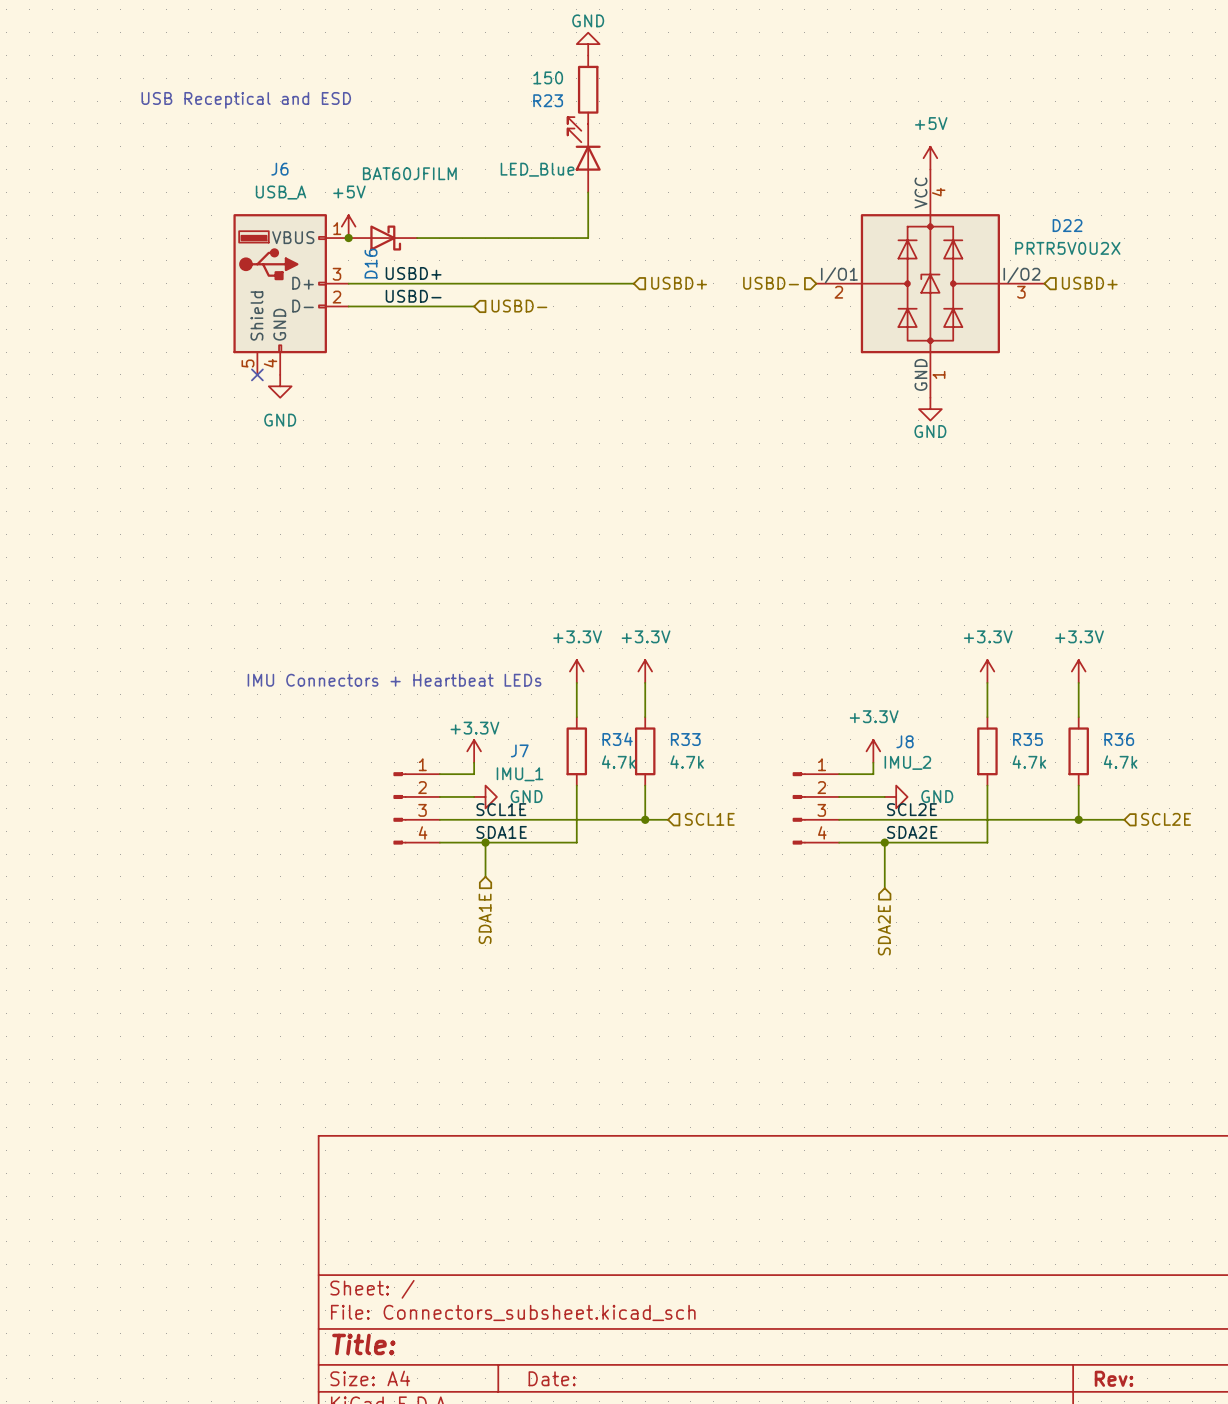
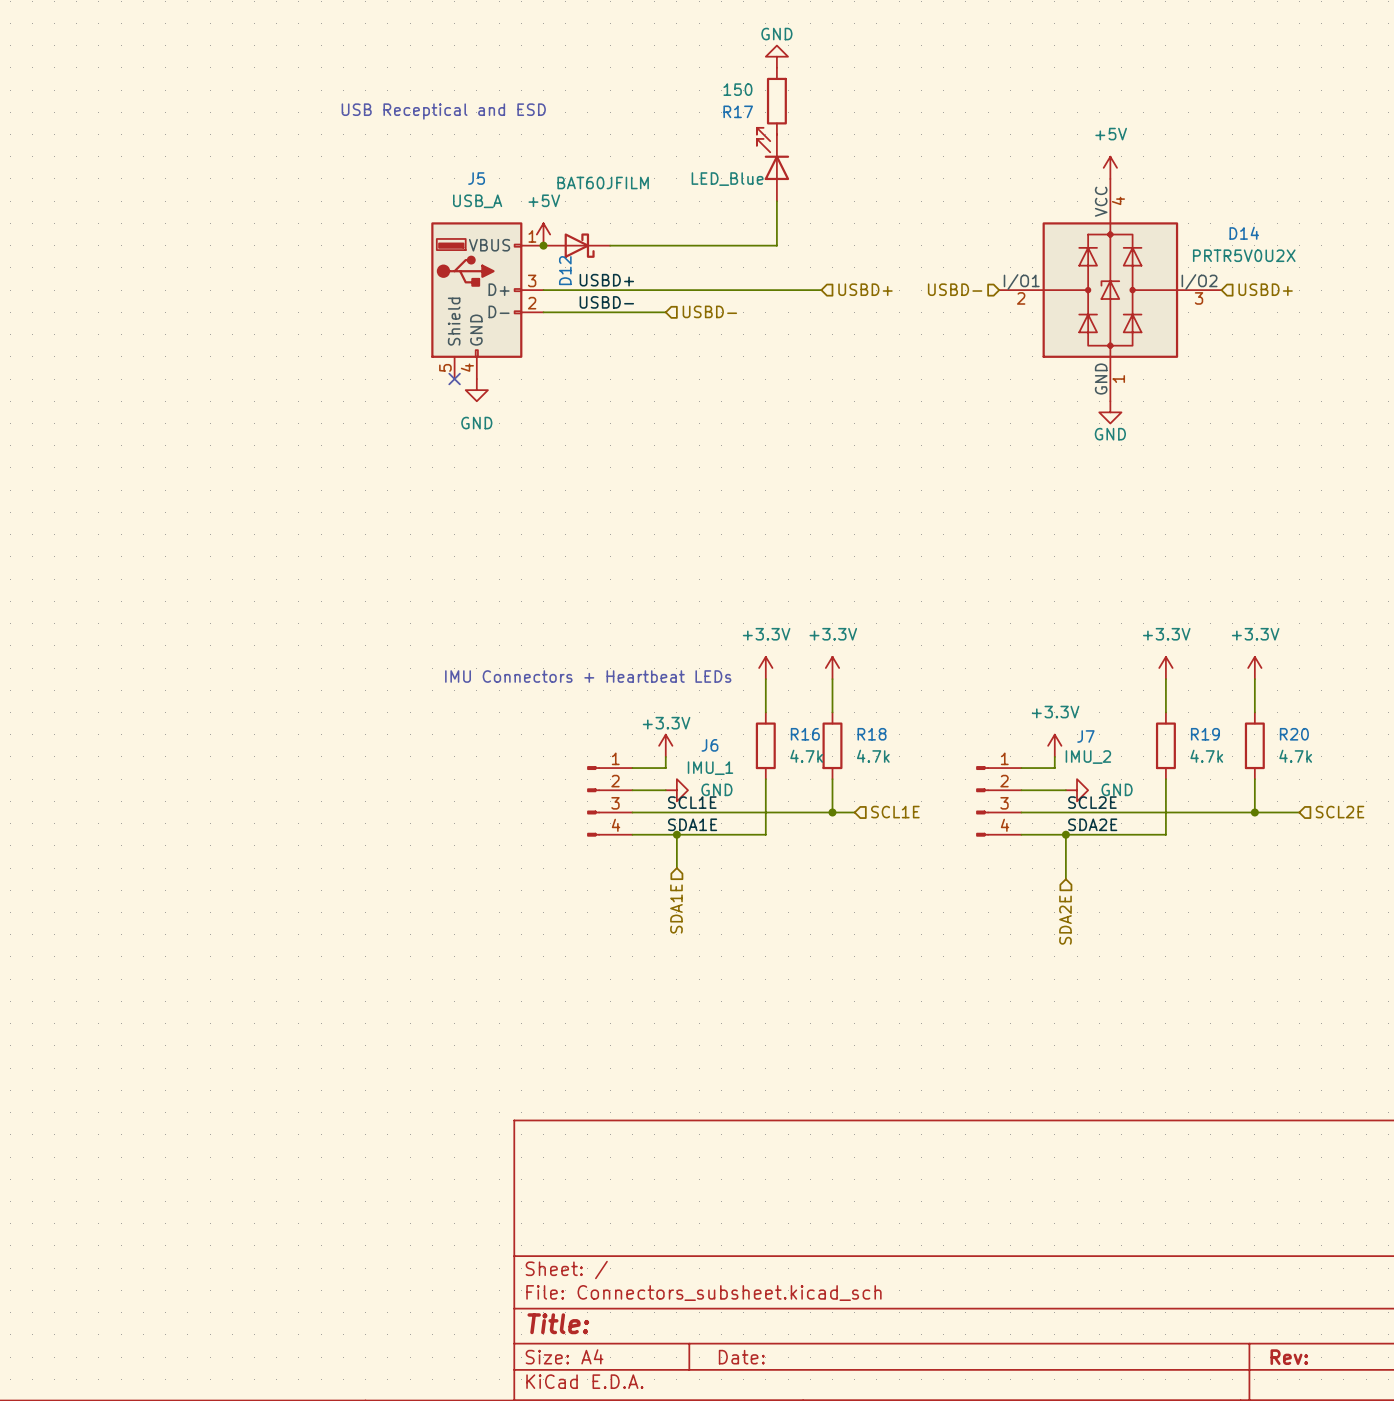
R23 name: R23 (548, 100) -> R17 (738, 111)
J6 name: J6 (279, 169) -> J5 (476, 178)
D22 name: D22 (1067, 225) -> D14 (1244, 233)
D16 name: D16 (371, 263) -> D12 (565, 270)
R34 name: R34 (617, 739) -> R16 (805, 734)
R33 name: R33 (685, 739) -> R18 (872, 734)
R35 name: R35 (1027, 739) -> R19 (1205, 734)
R36 name: R36 (1119, 739) -> R20 (1294, 734)
J8 name: J8 (905, 741) -> J7 (1085, 736)
J7 name: J7 (519, 750) -> J6 (709, 745)

